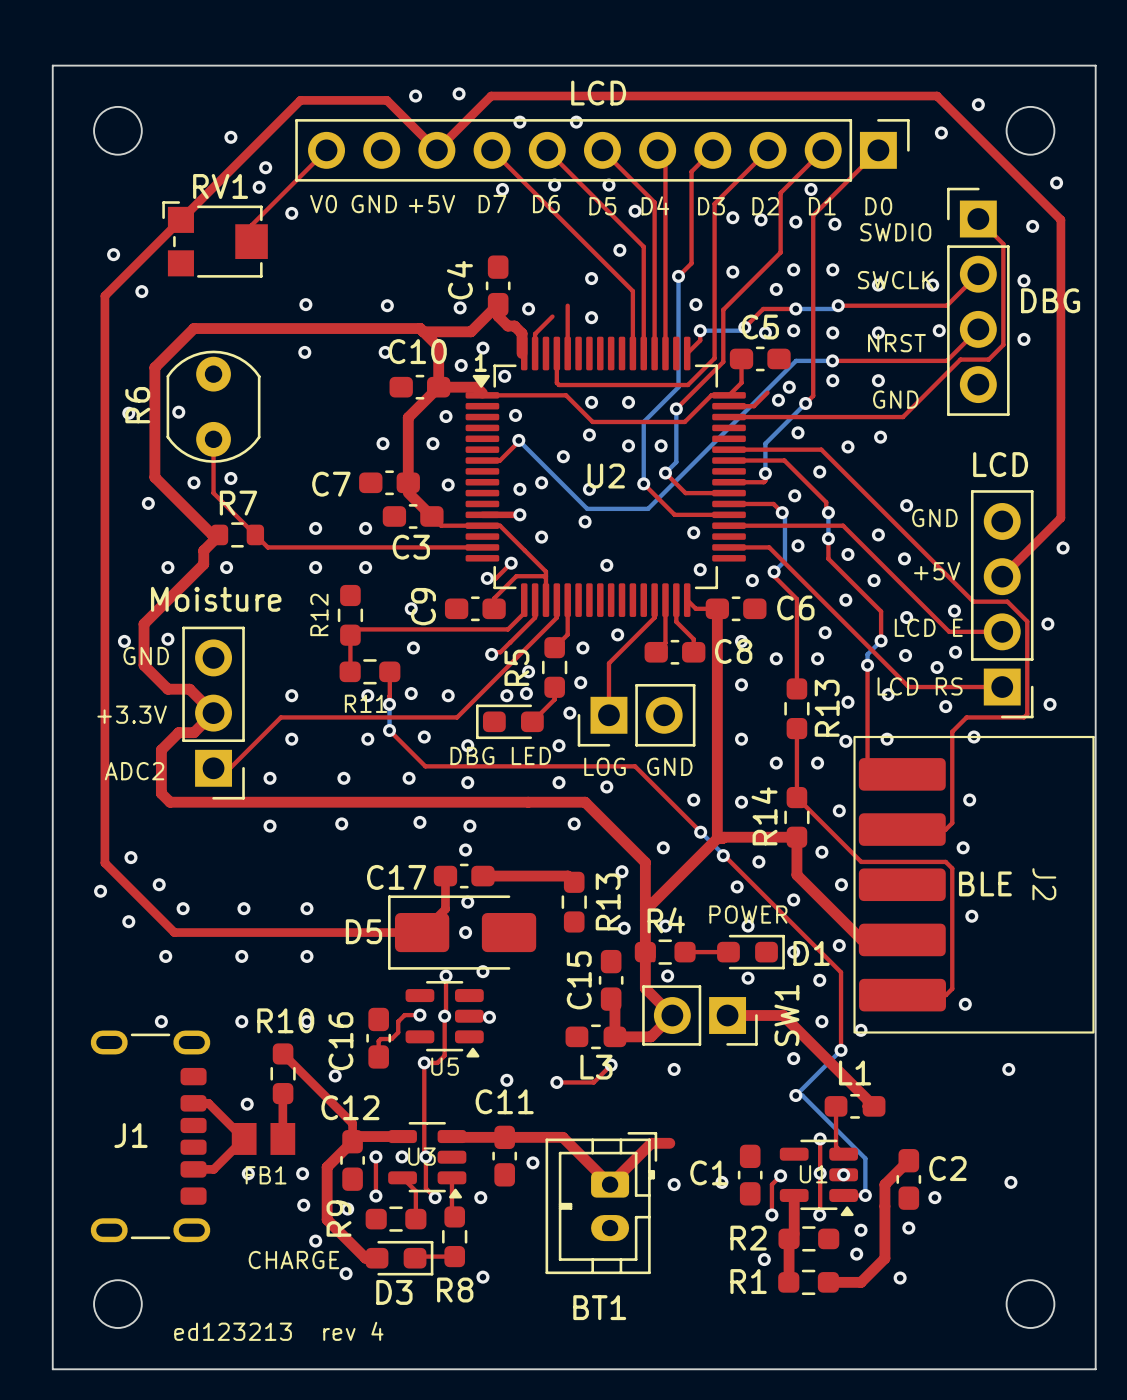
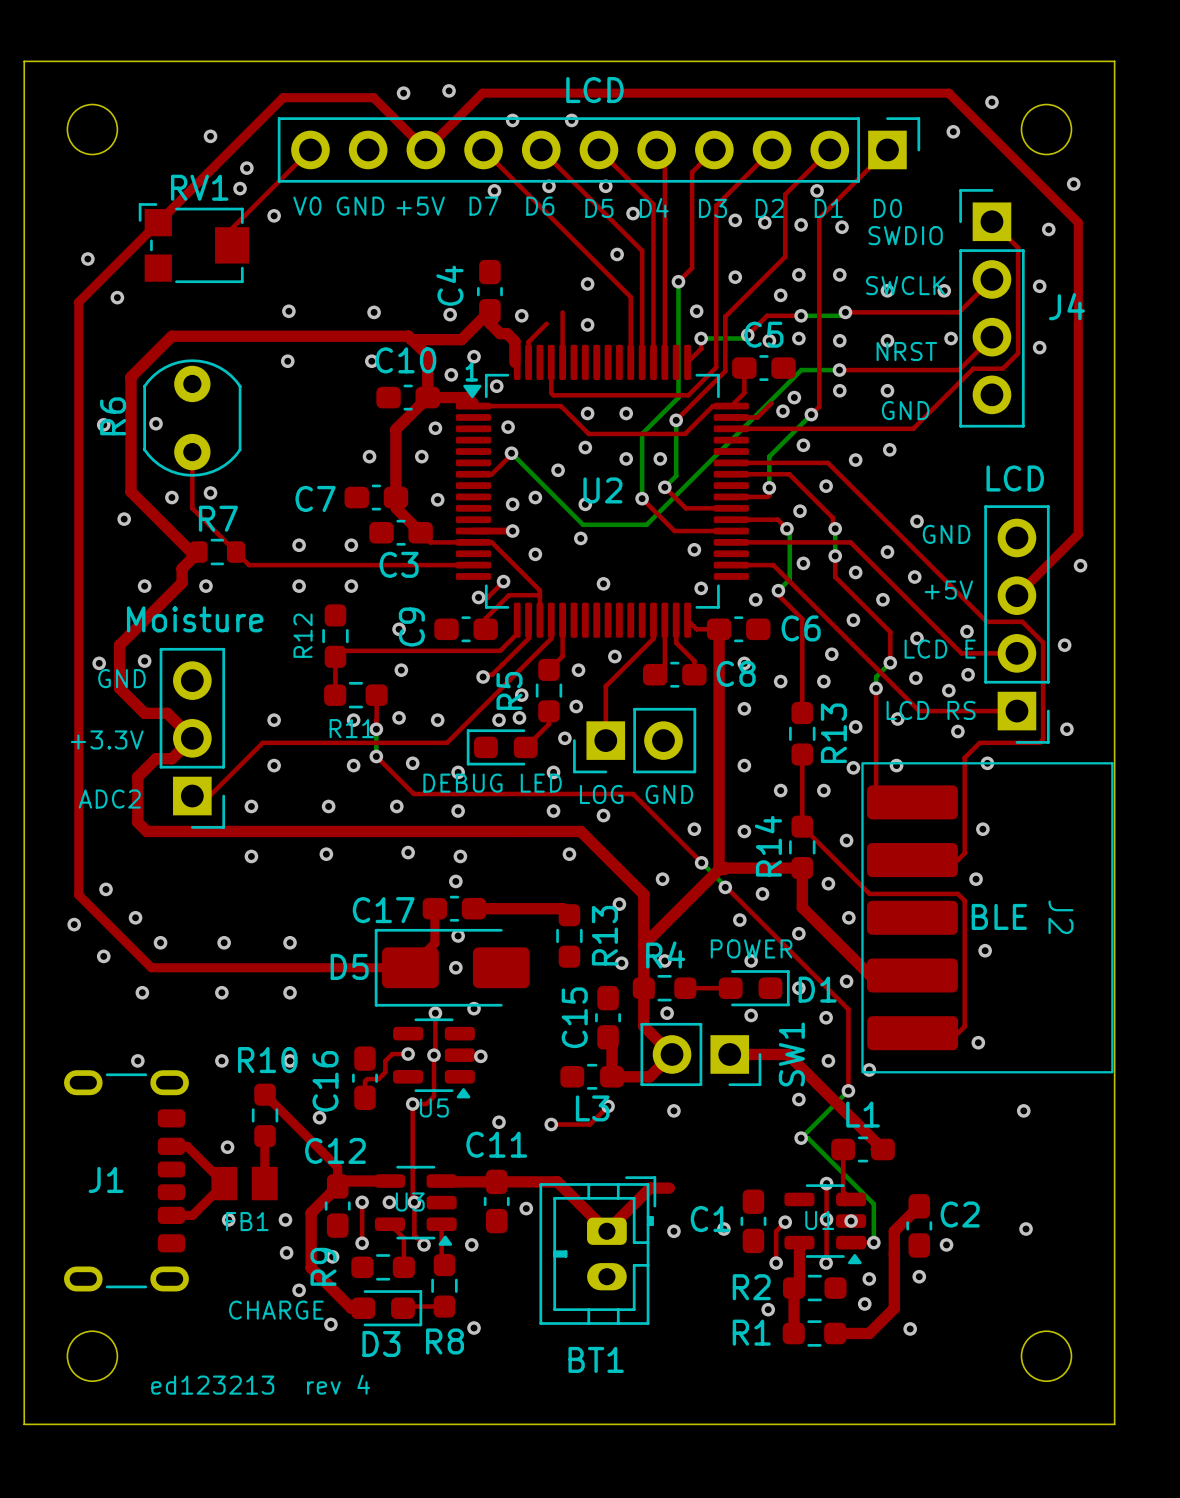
DBG name: DBG (1050, 300) -> J4 (1066, 306)
part value: DBG LED (500, 755) -> DEBUG LED (492, 783)

